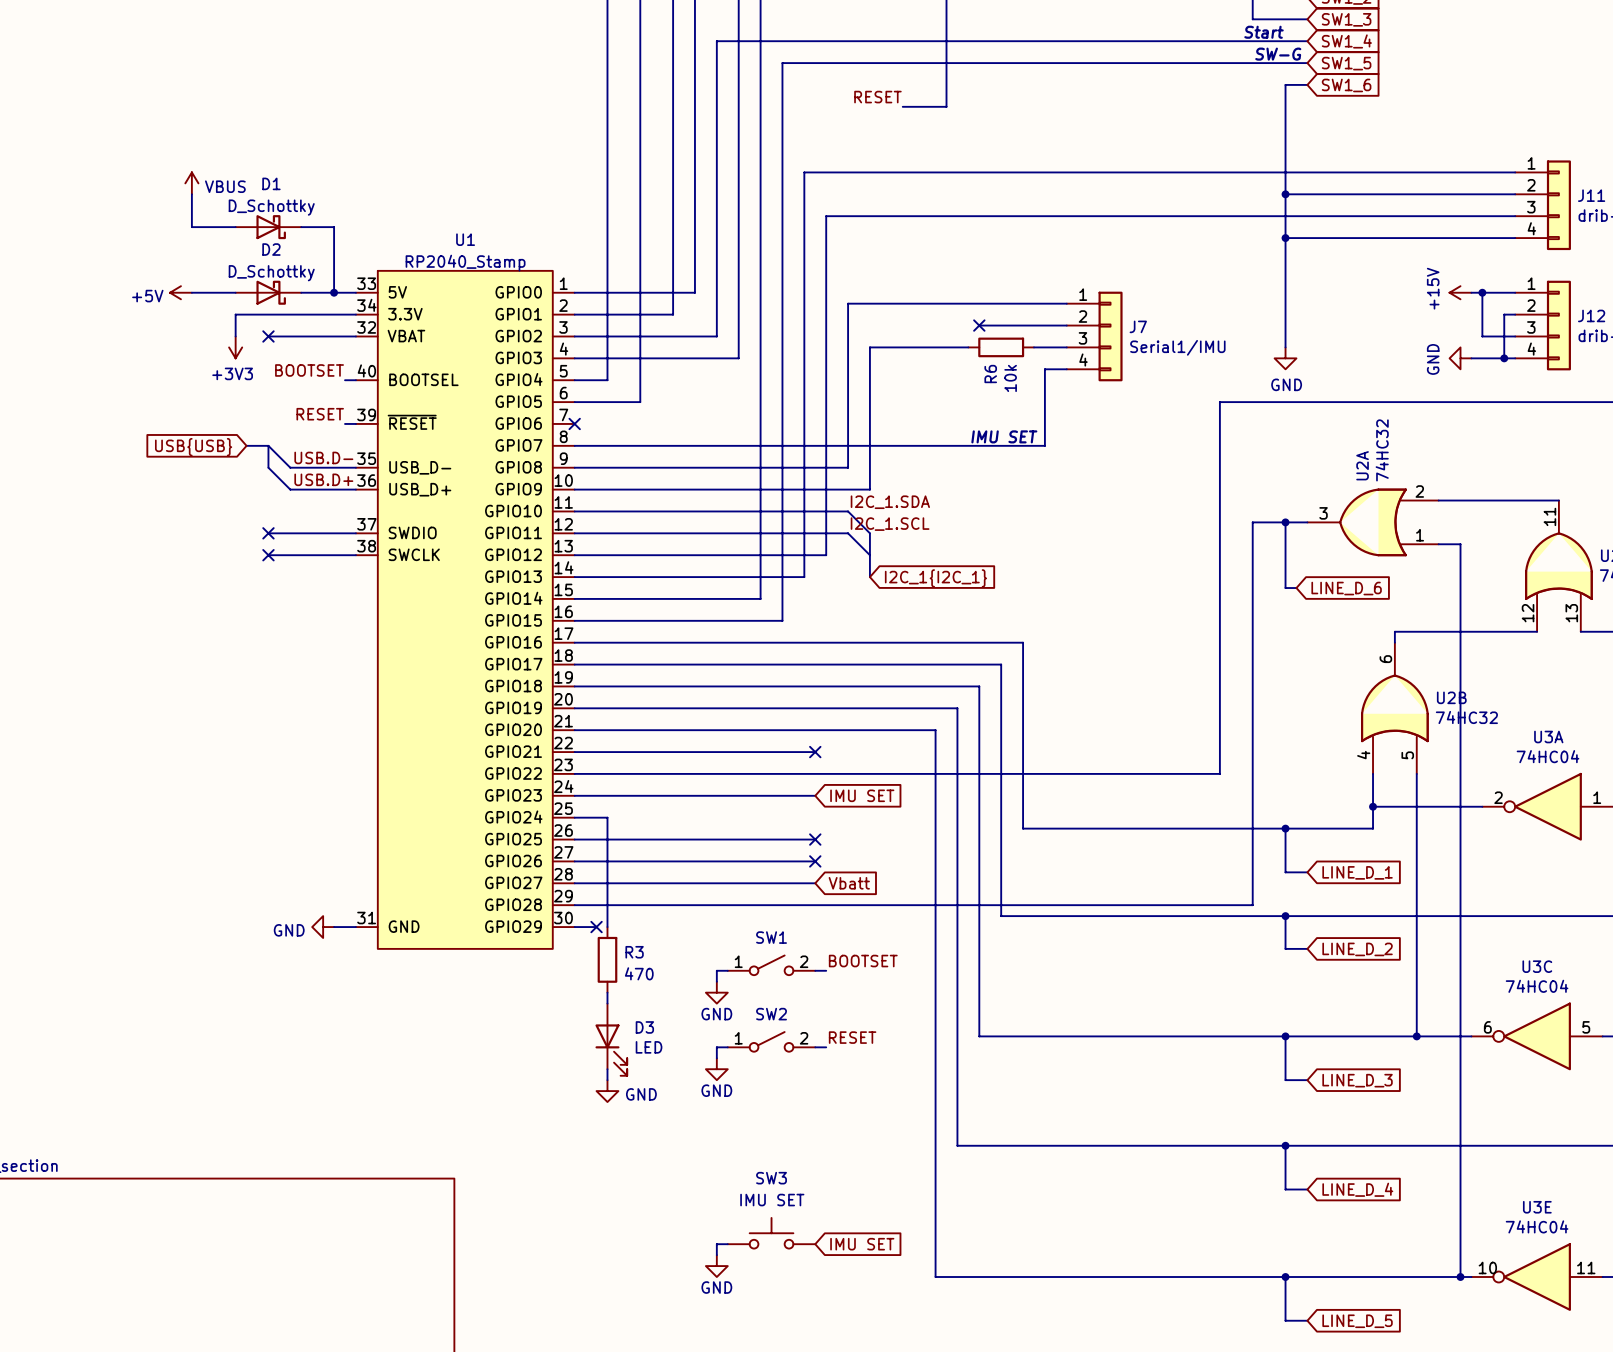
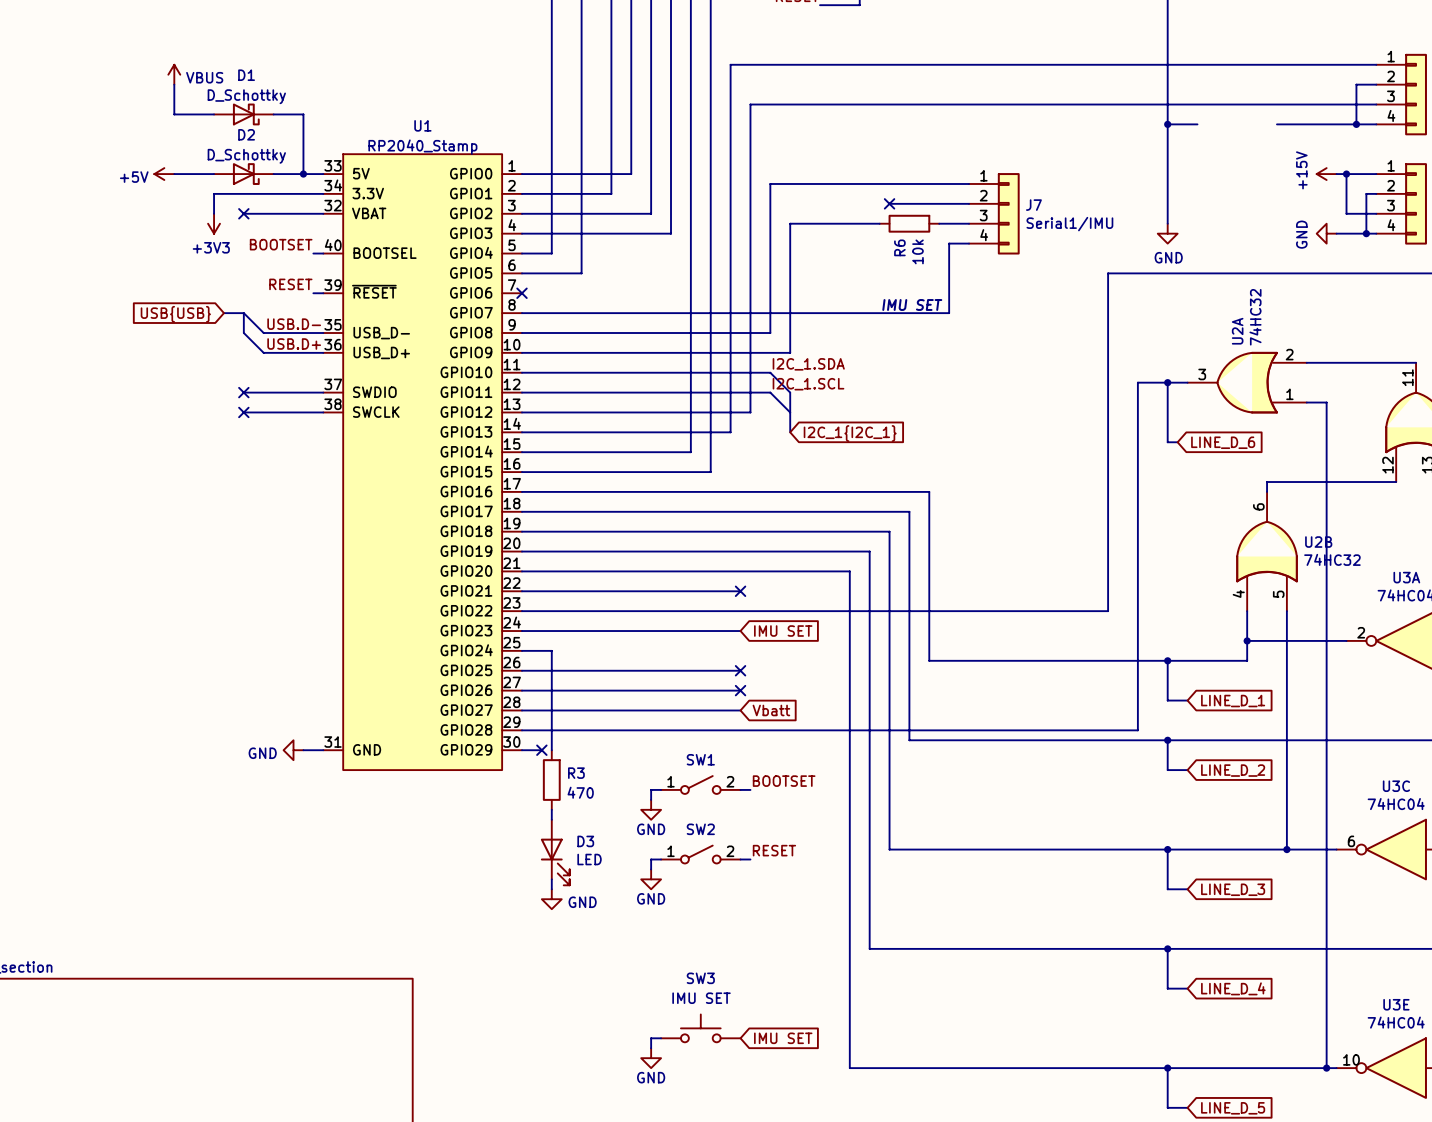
wire: (1285, 194) (1493, 194) -> (1356, 124) (1356, 84)
junction: (1285, 194) -> none
wire: (1318, 238) (1405, 238) -> none
junction: none -> (1356, 124)

